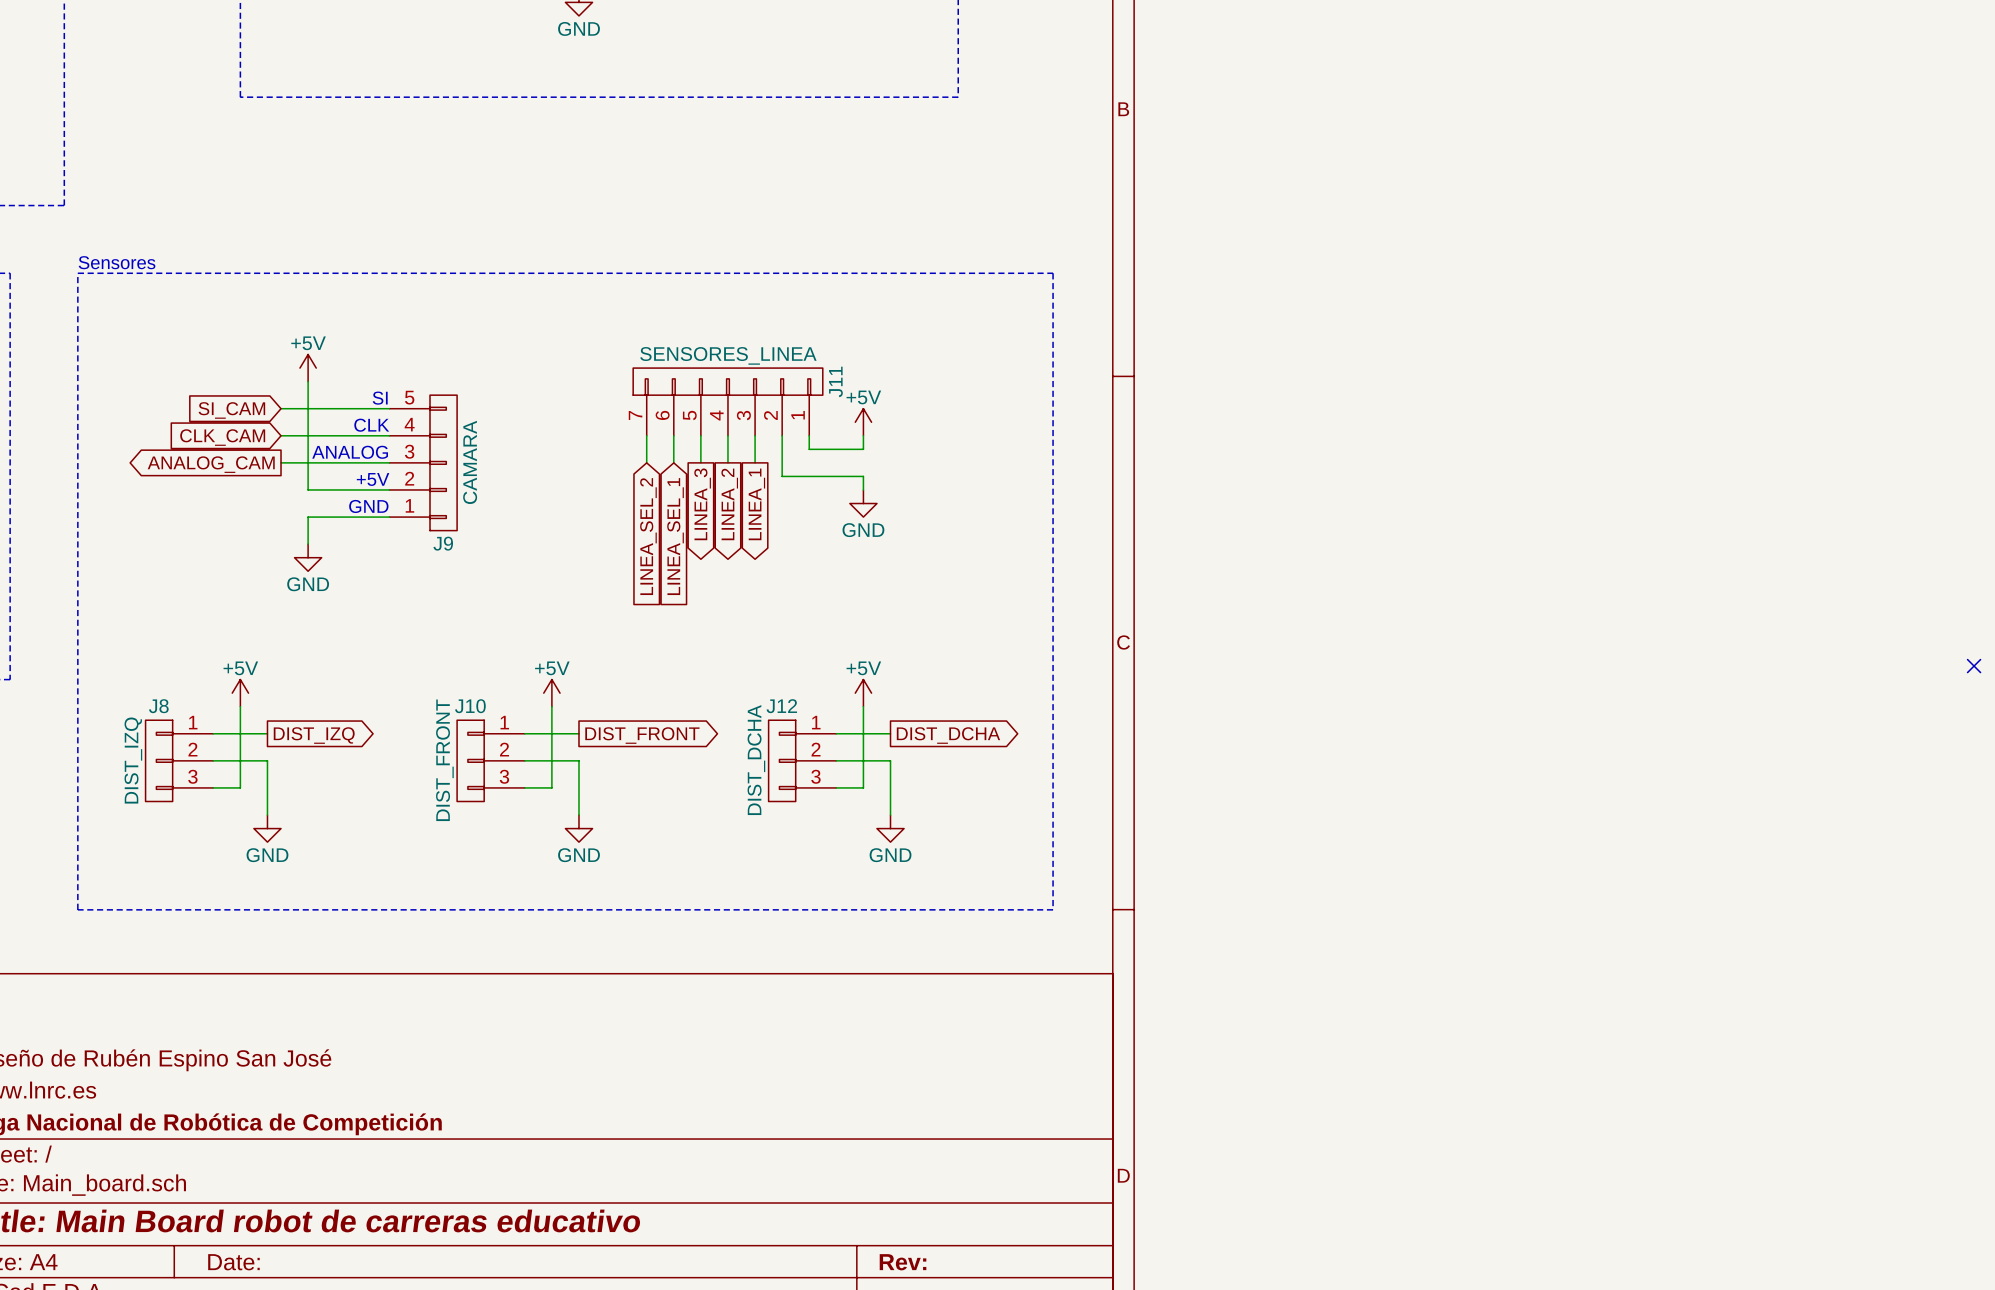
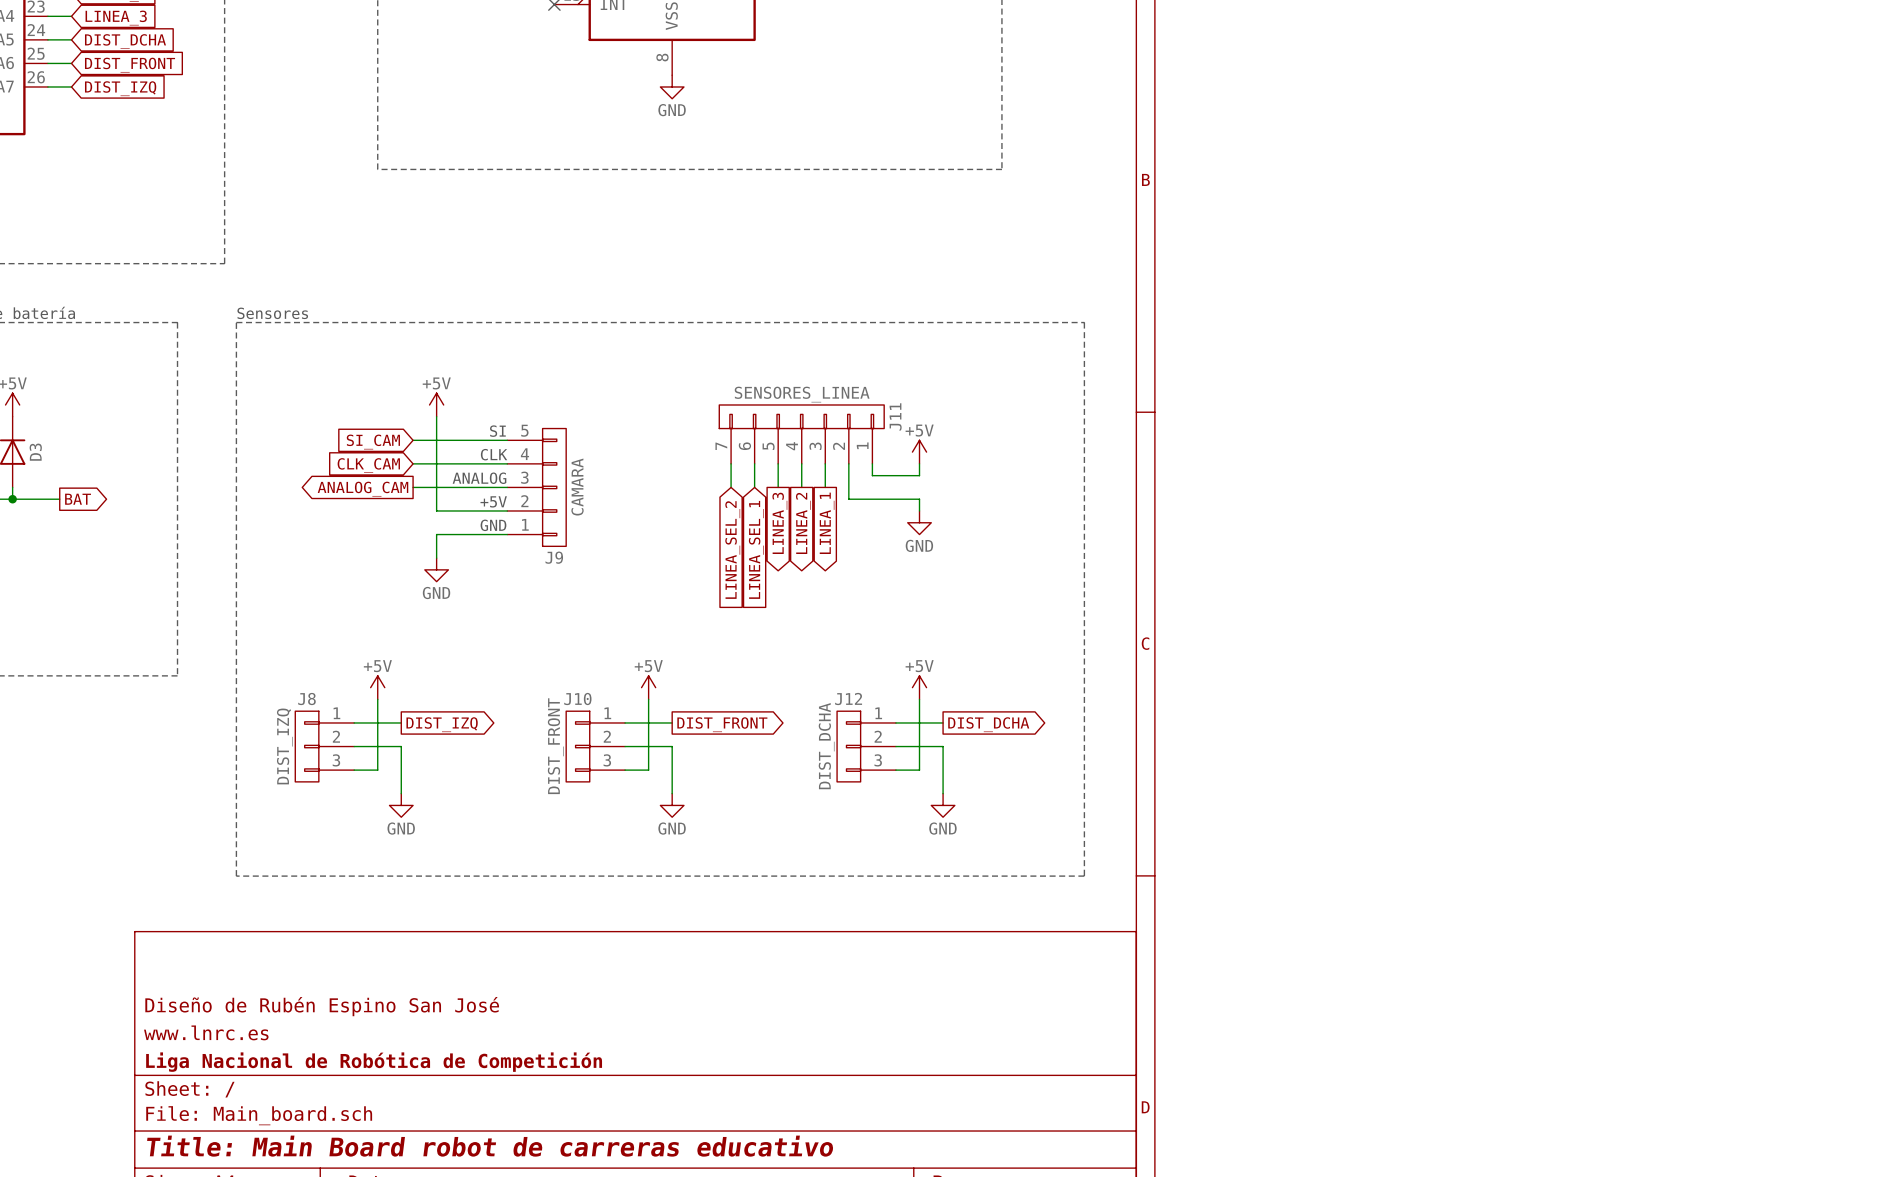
no-connect mark: (1974, 666) -> none

